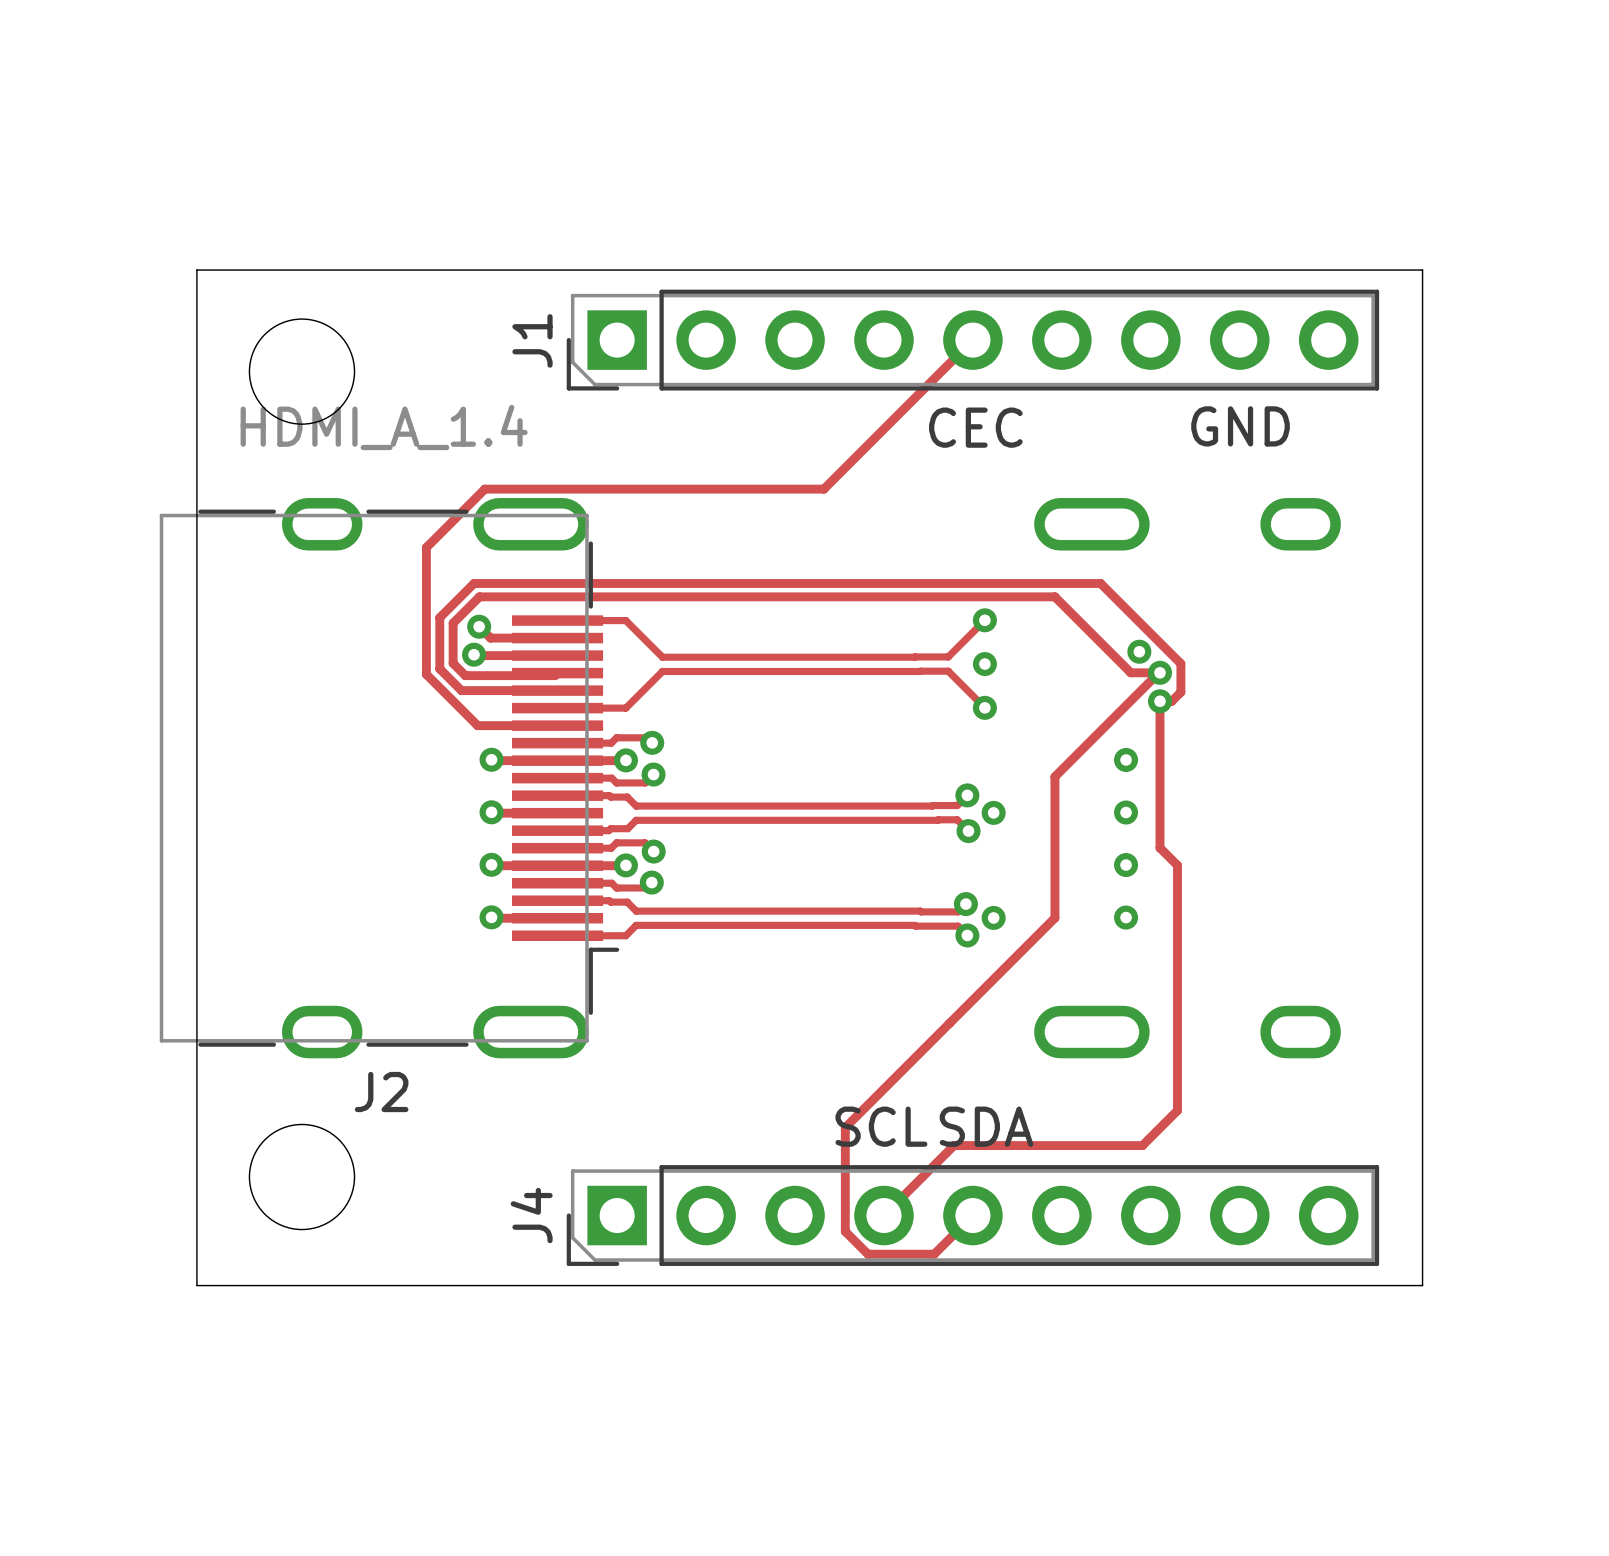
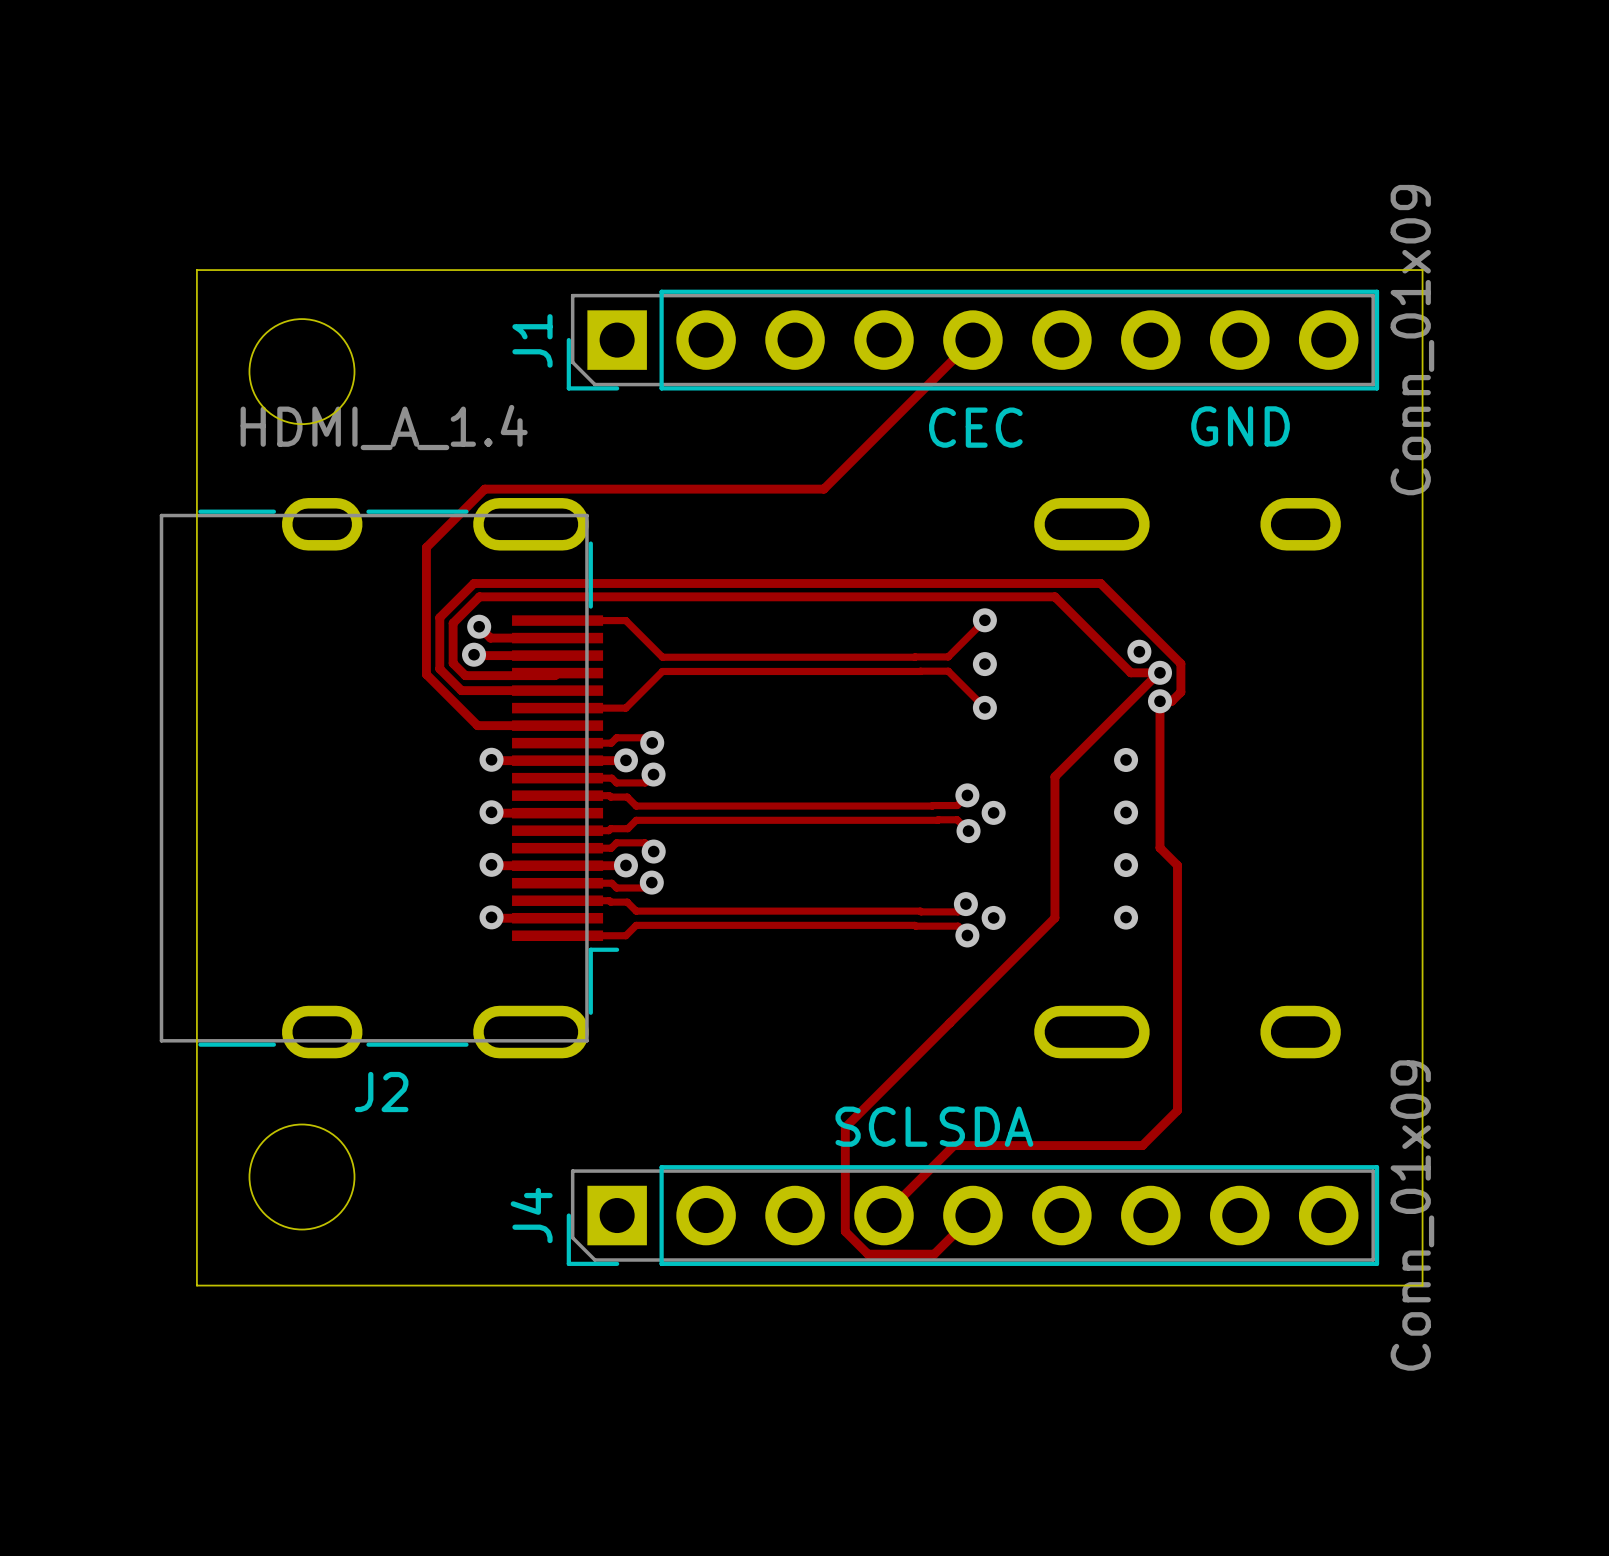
J1 value: none -> Conn_01x09 (1412, 340)
J4 value: none -> Conn_01x09 (1412, 1215)

